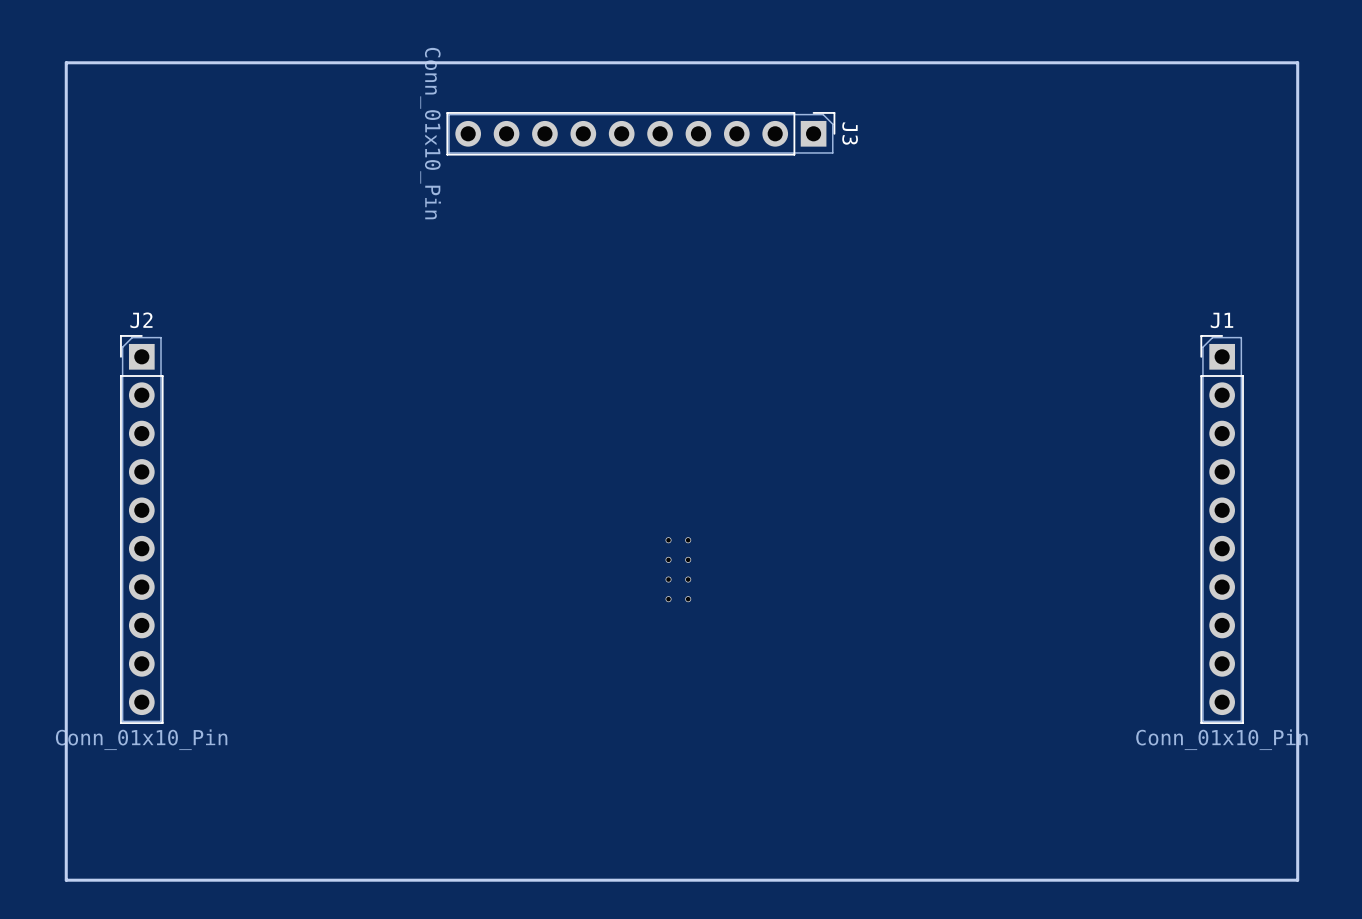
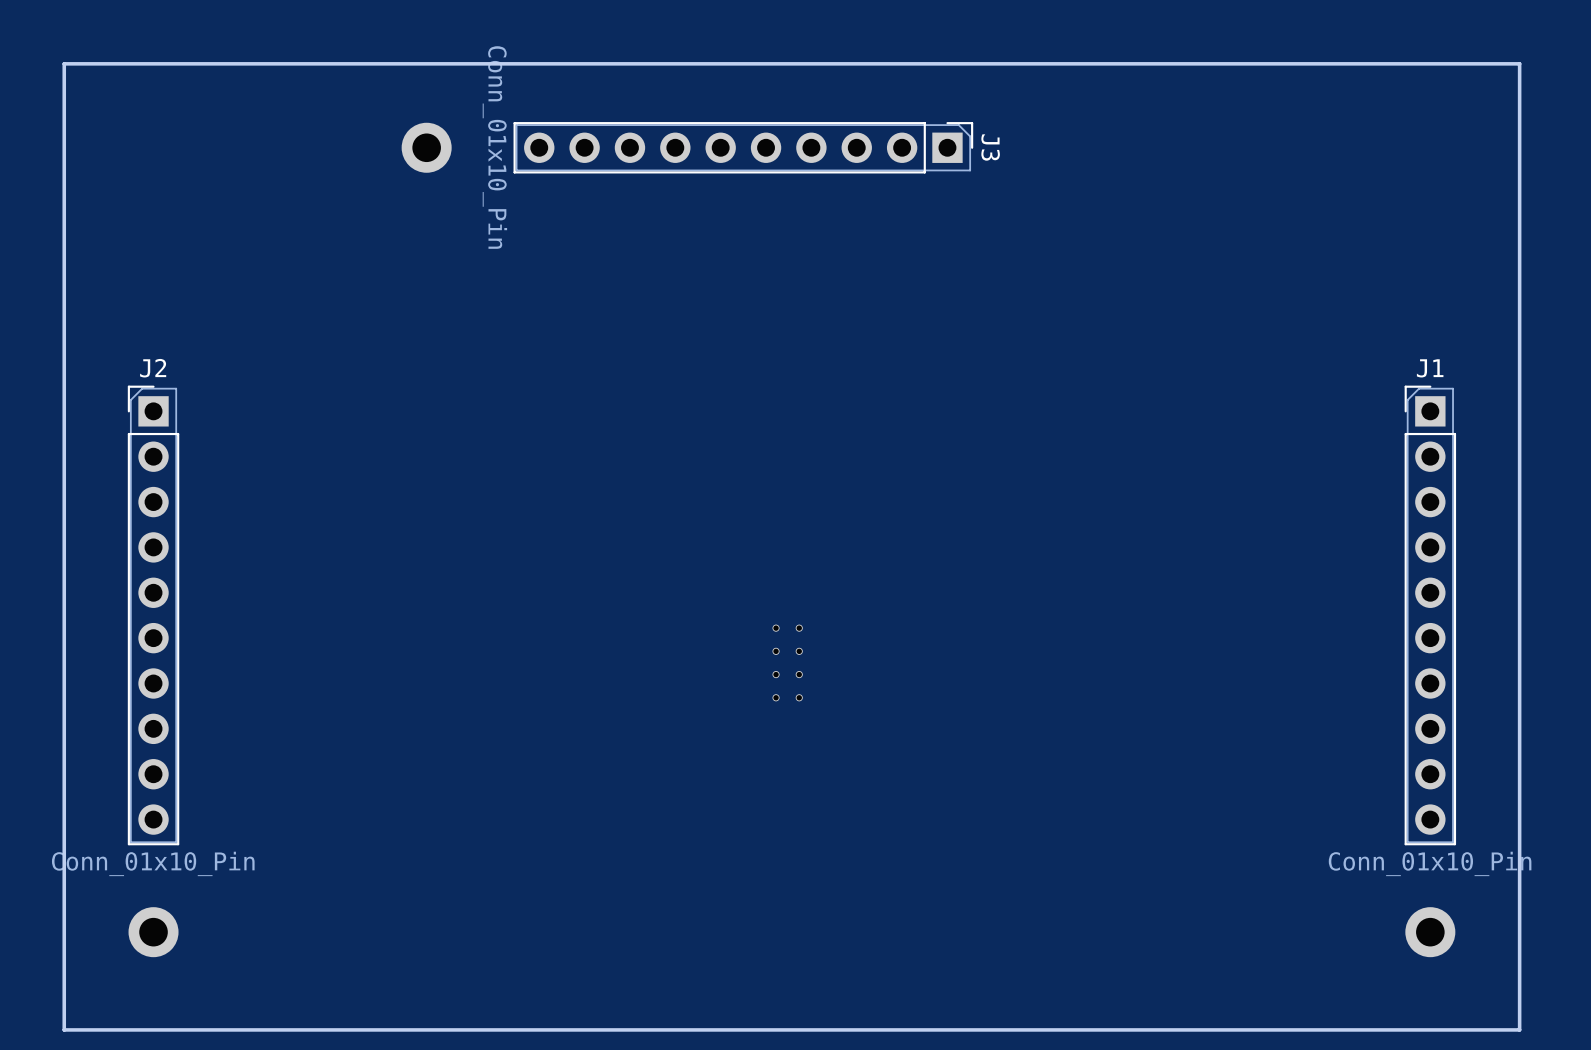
part: none -> (426, 147)
part: none -> (153, 932)
part: none -> (1430, 932)

